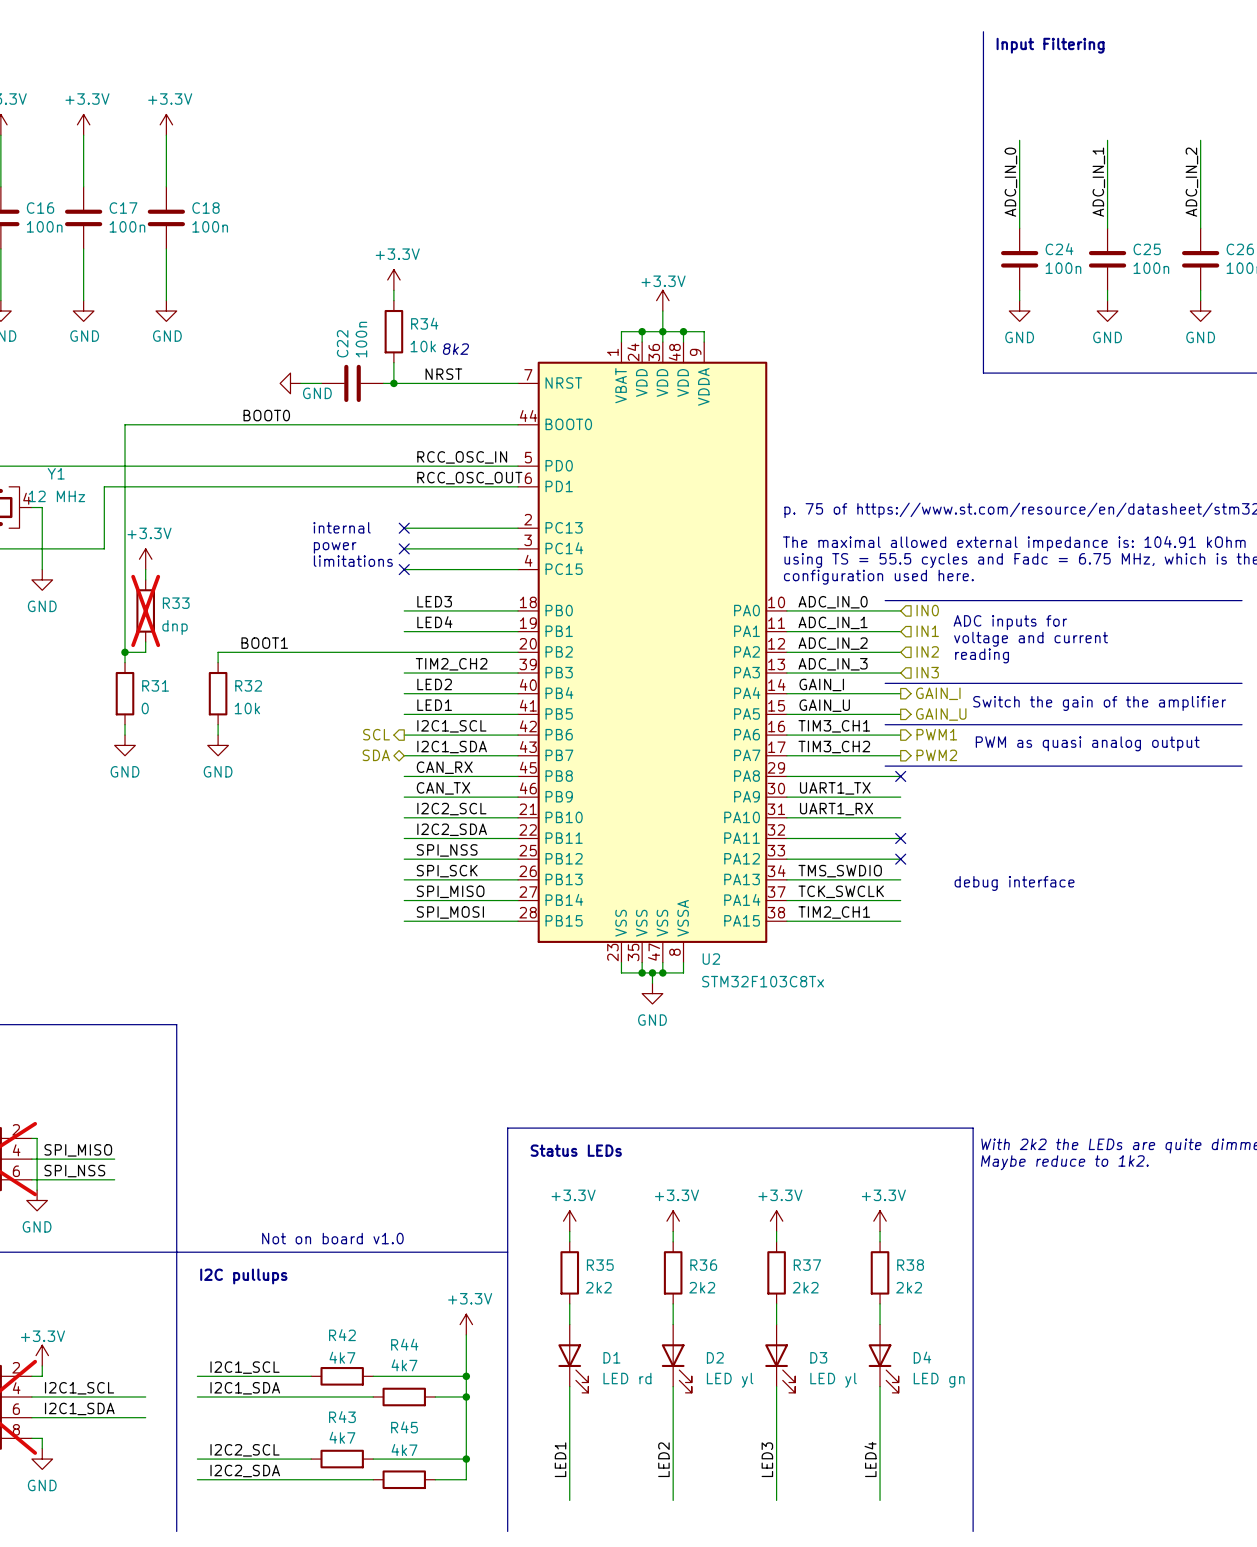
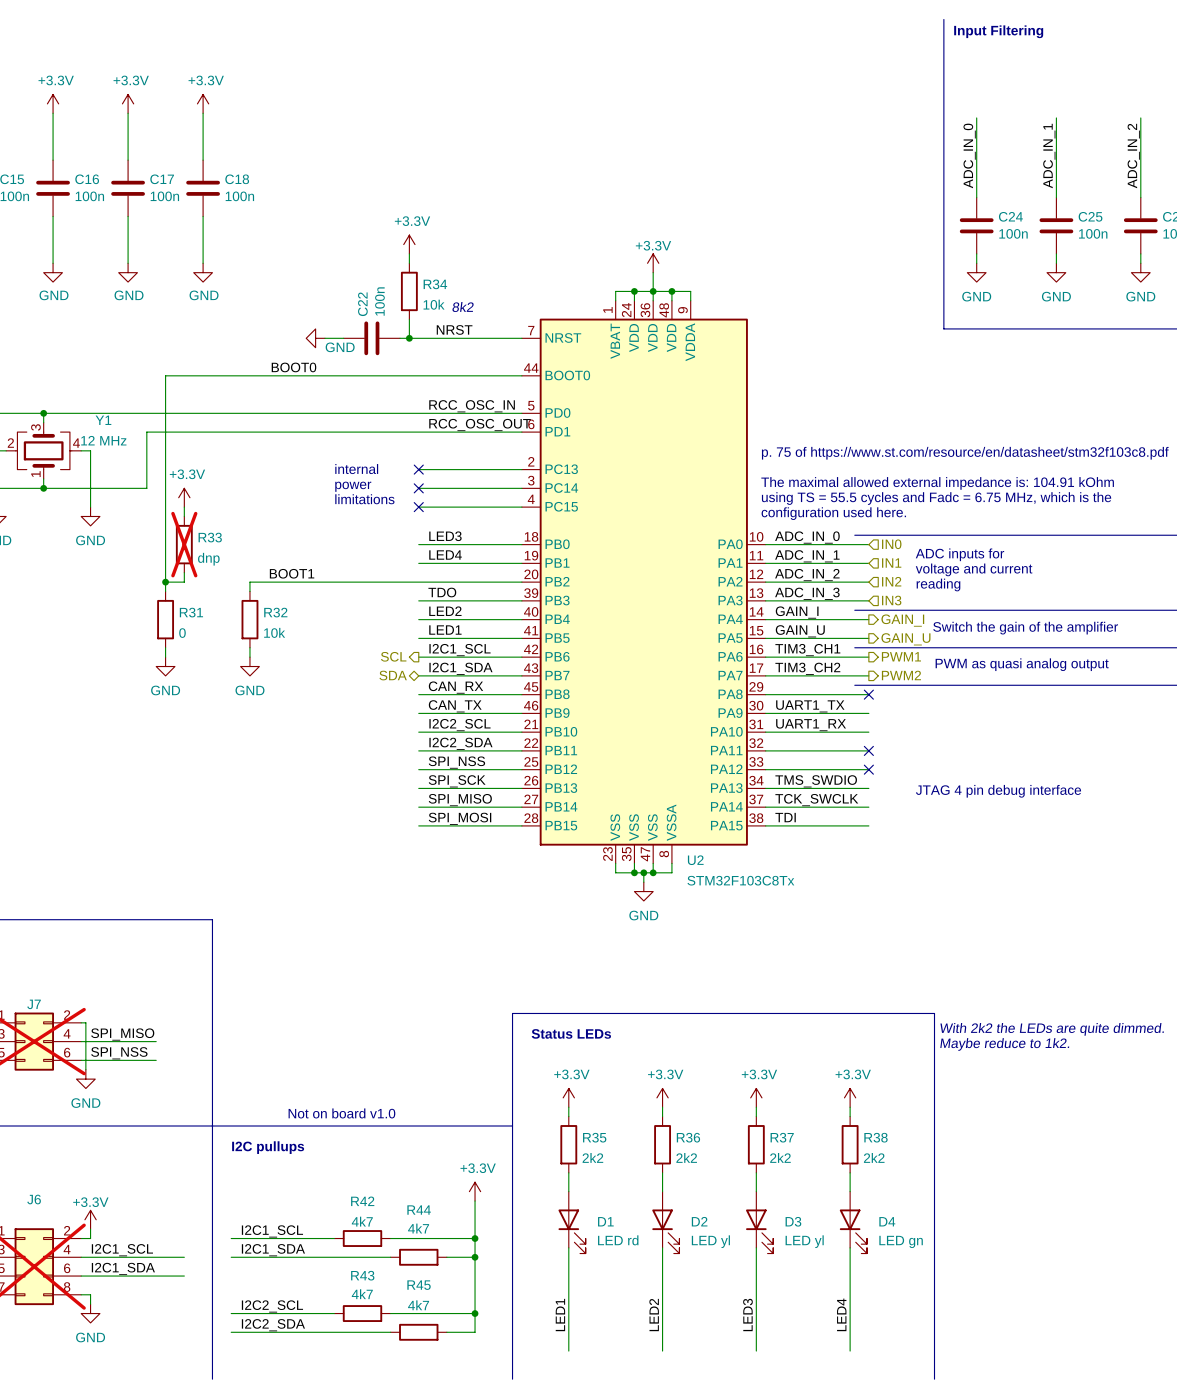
label: TIM2_CH2 (451, 664) -> TDO (442, 592)
text: debug interface (1014, 883) -> JTAG 4 pin debug interface (998, 791)
label: TIM2_CH1 (834, 912) -> TDI (785, 817)

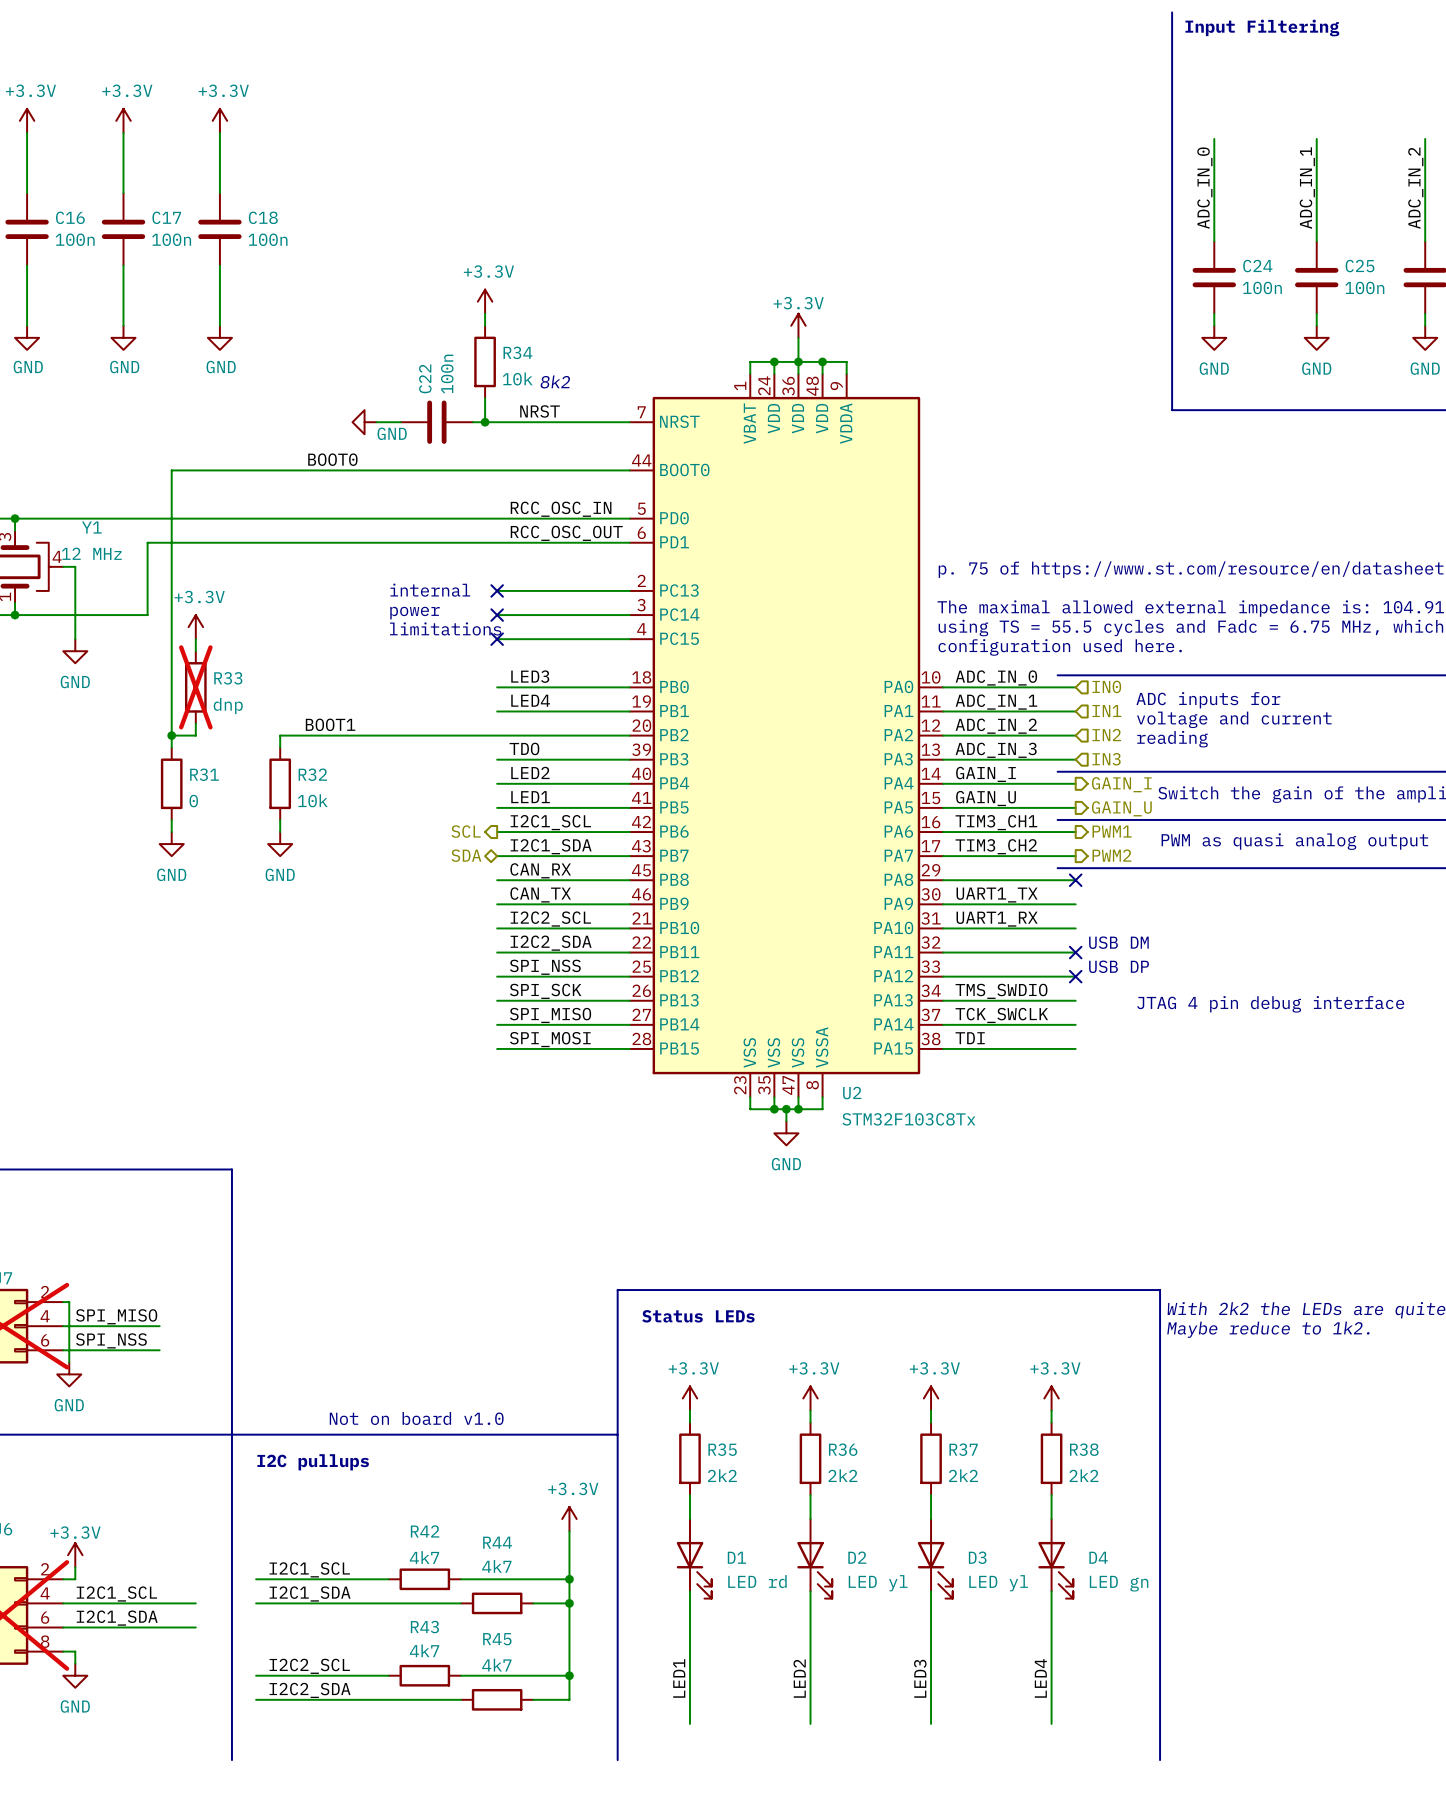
text: none -> USB DM (1118, 942)
text: none -> USB DP (1119, 966)

